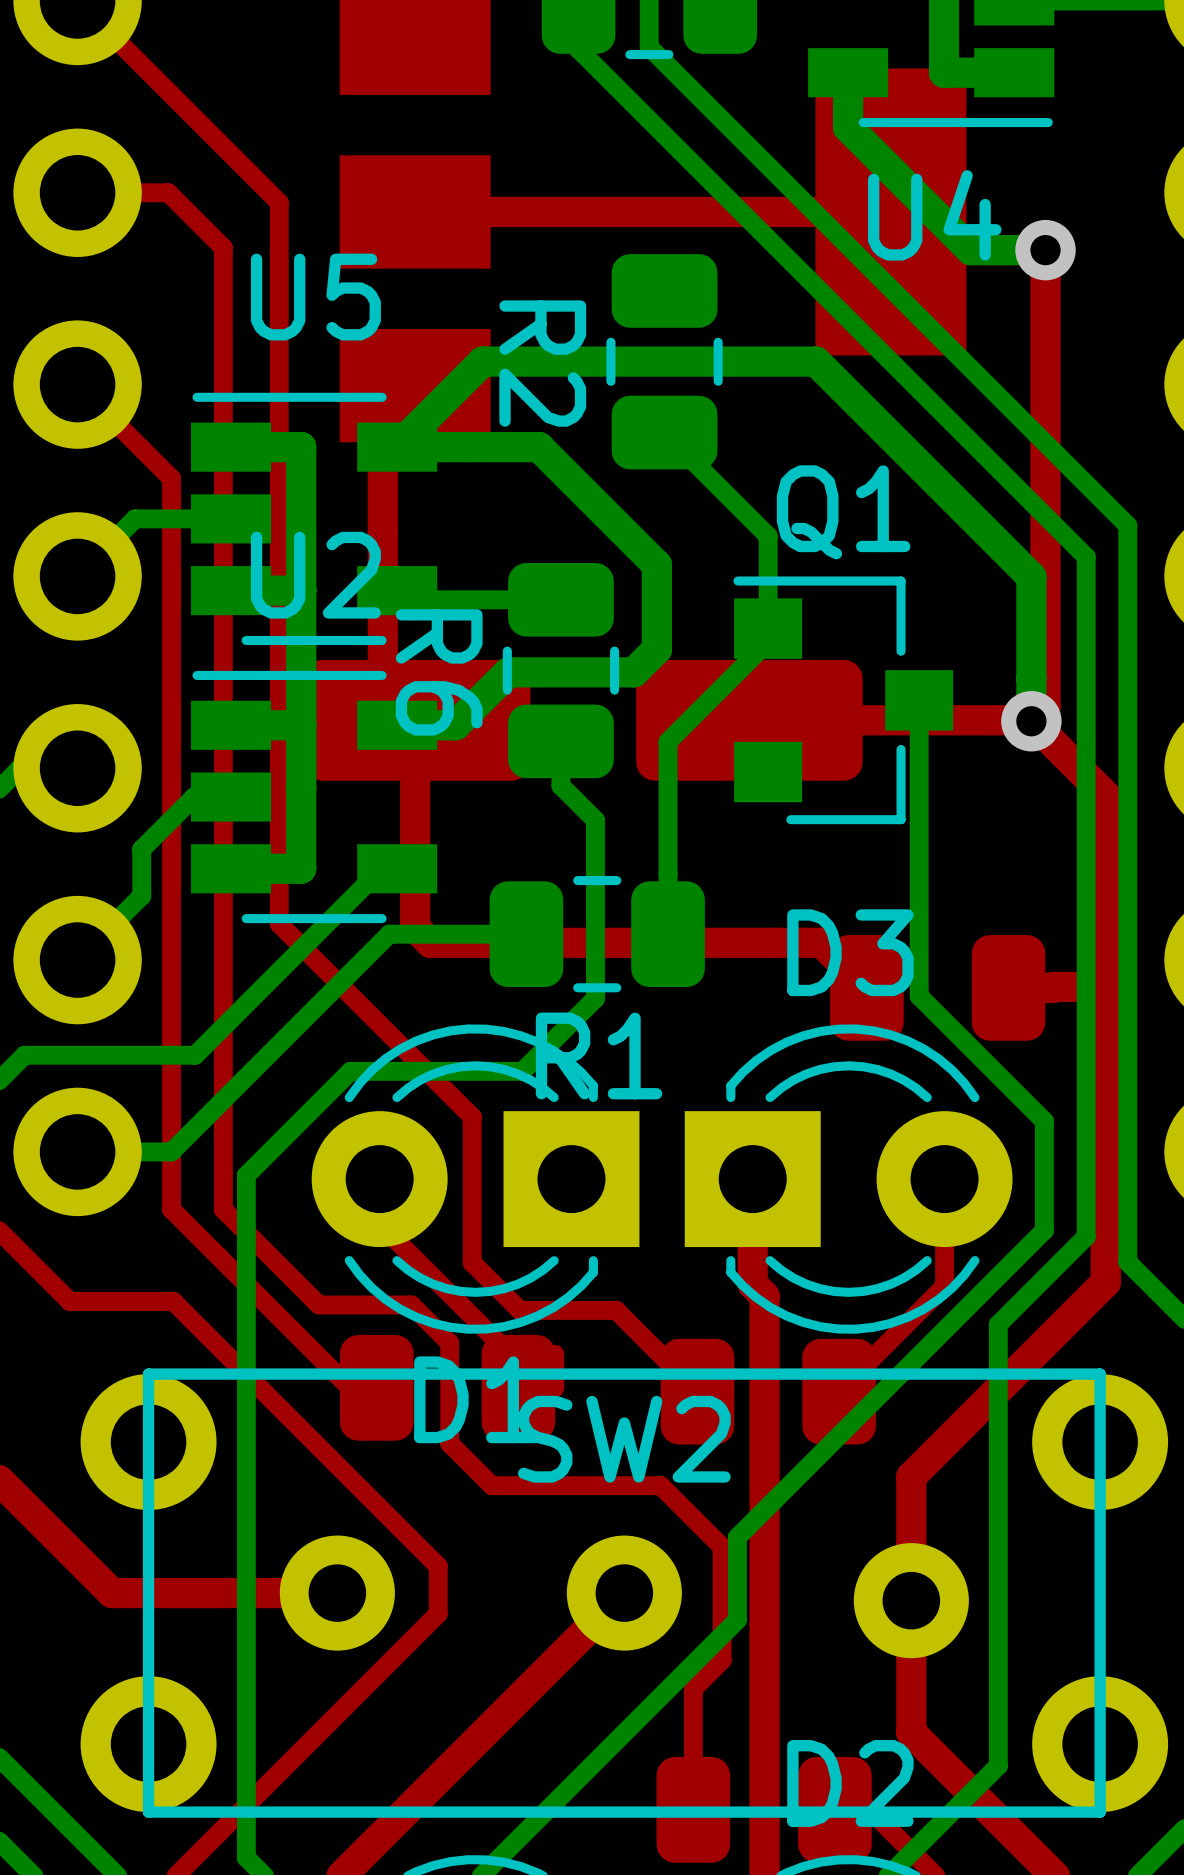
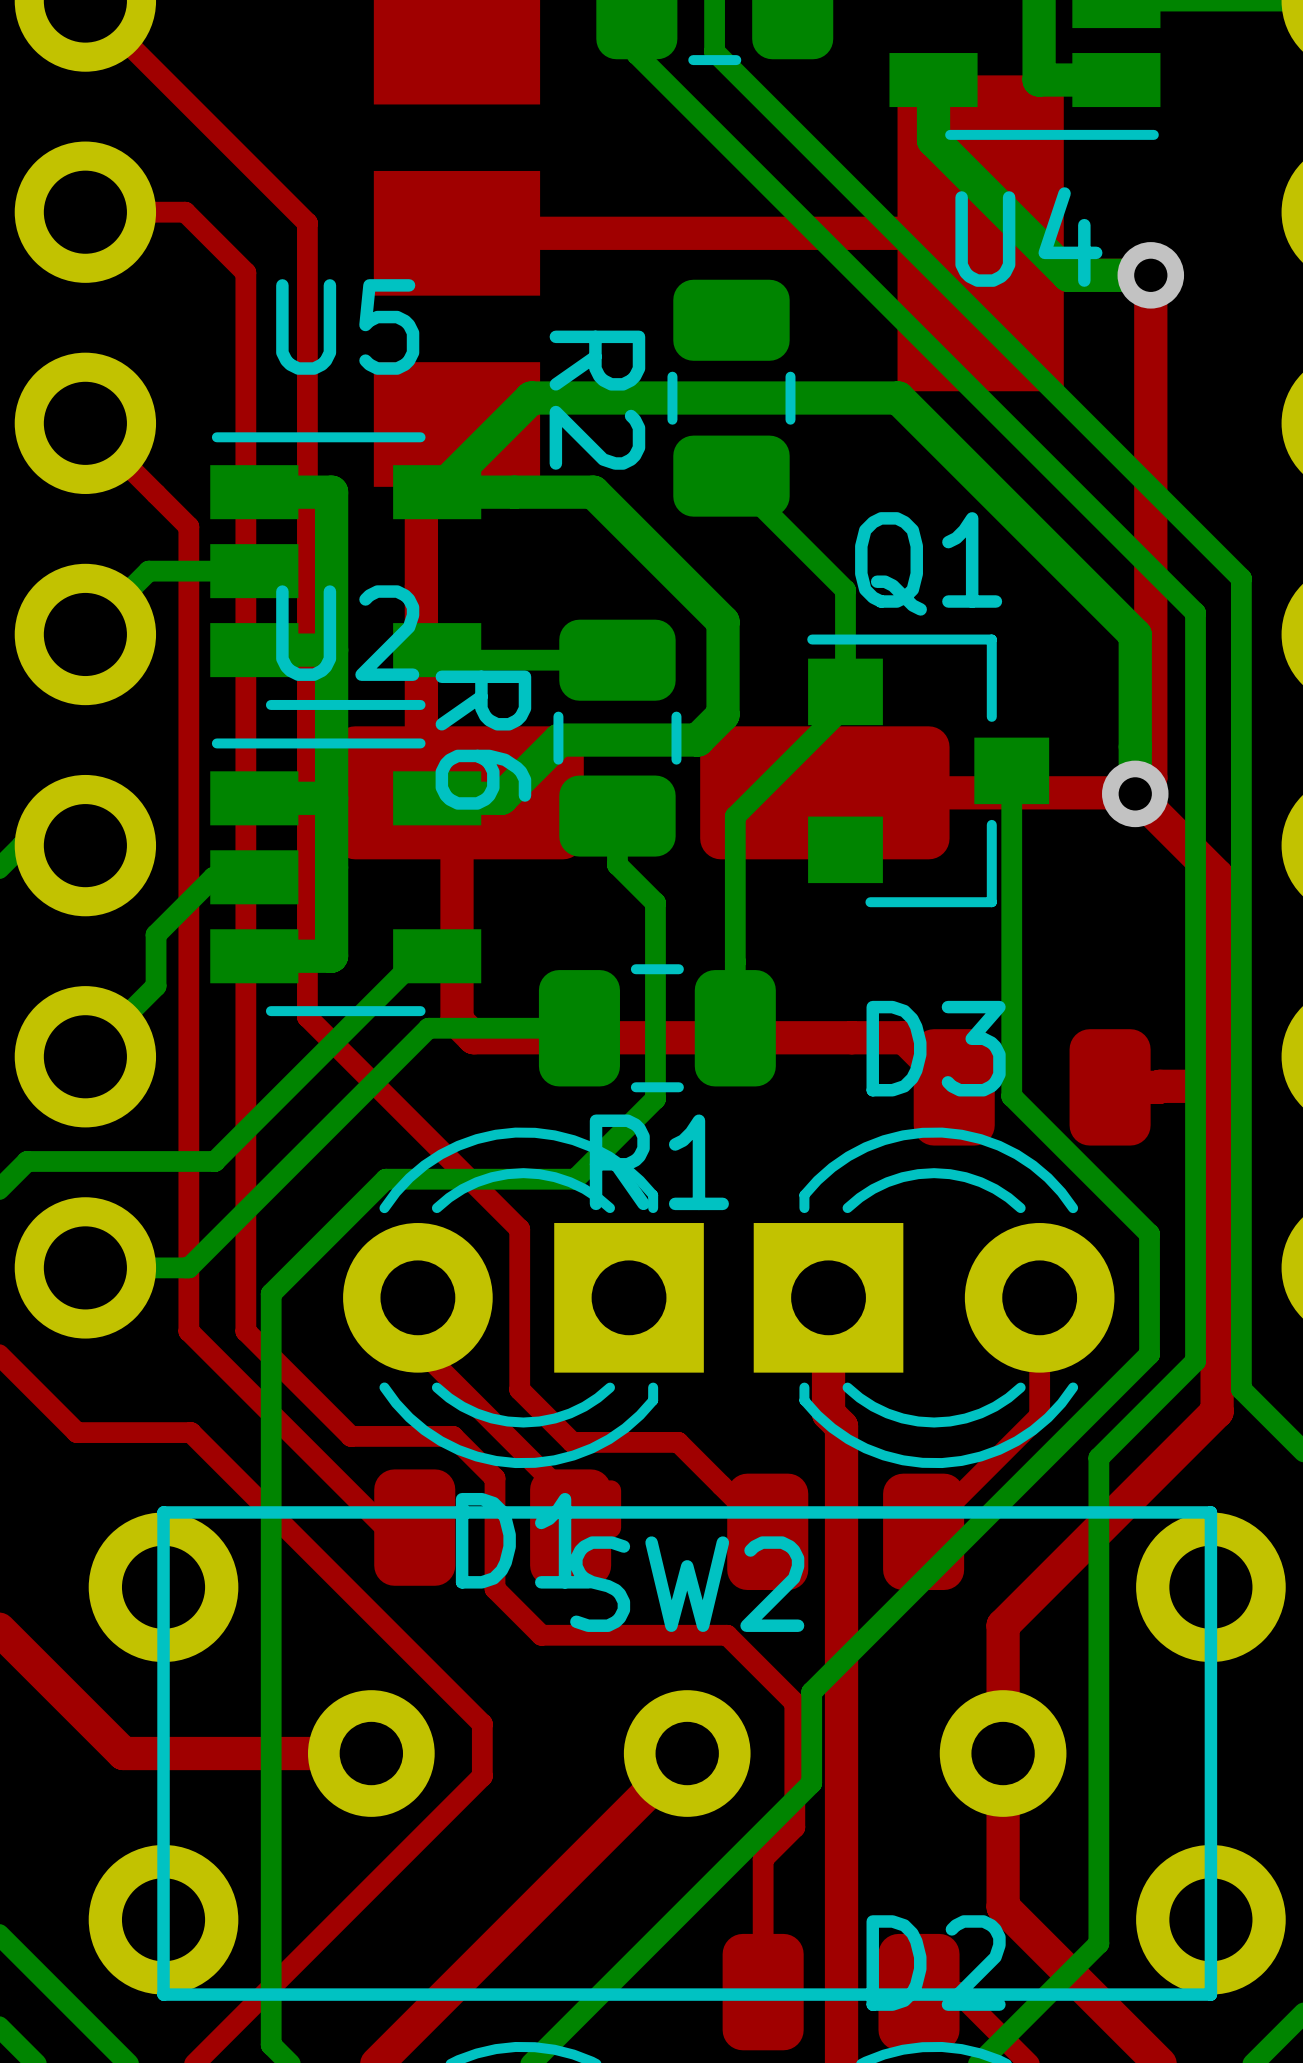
SW2 footprint: [80, 1368, 1169, 1818] -> [88, 1506, 1286, 2001]

